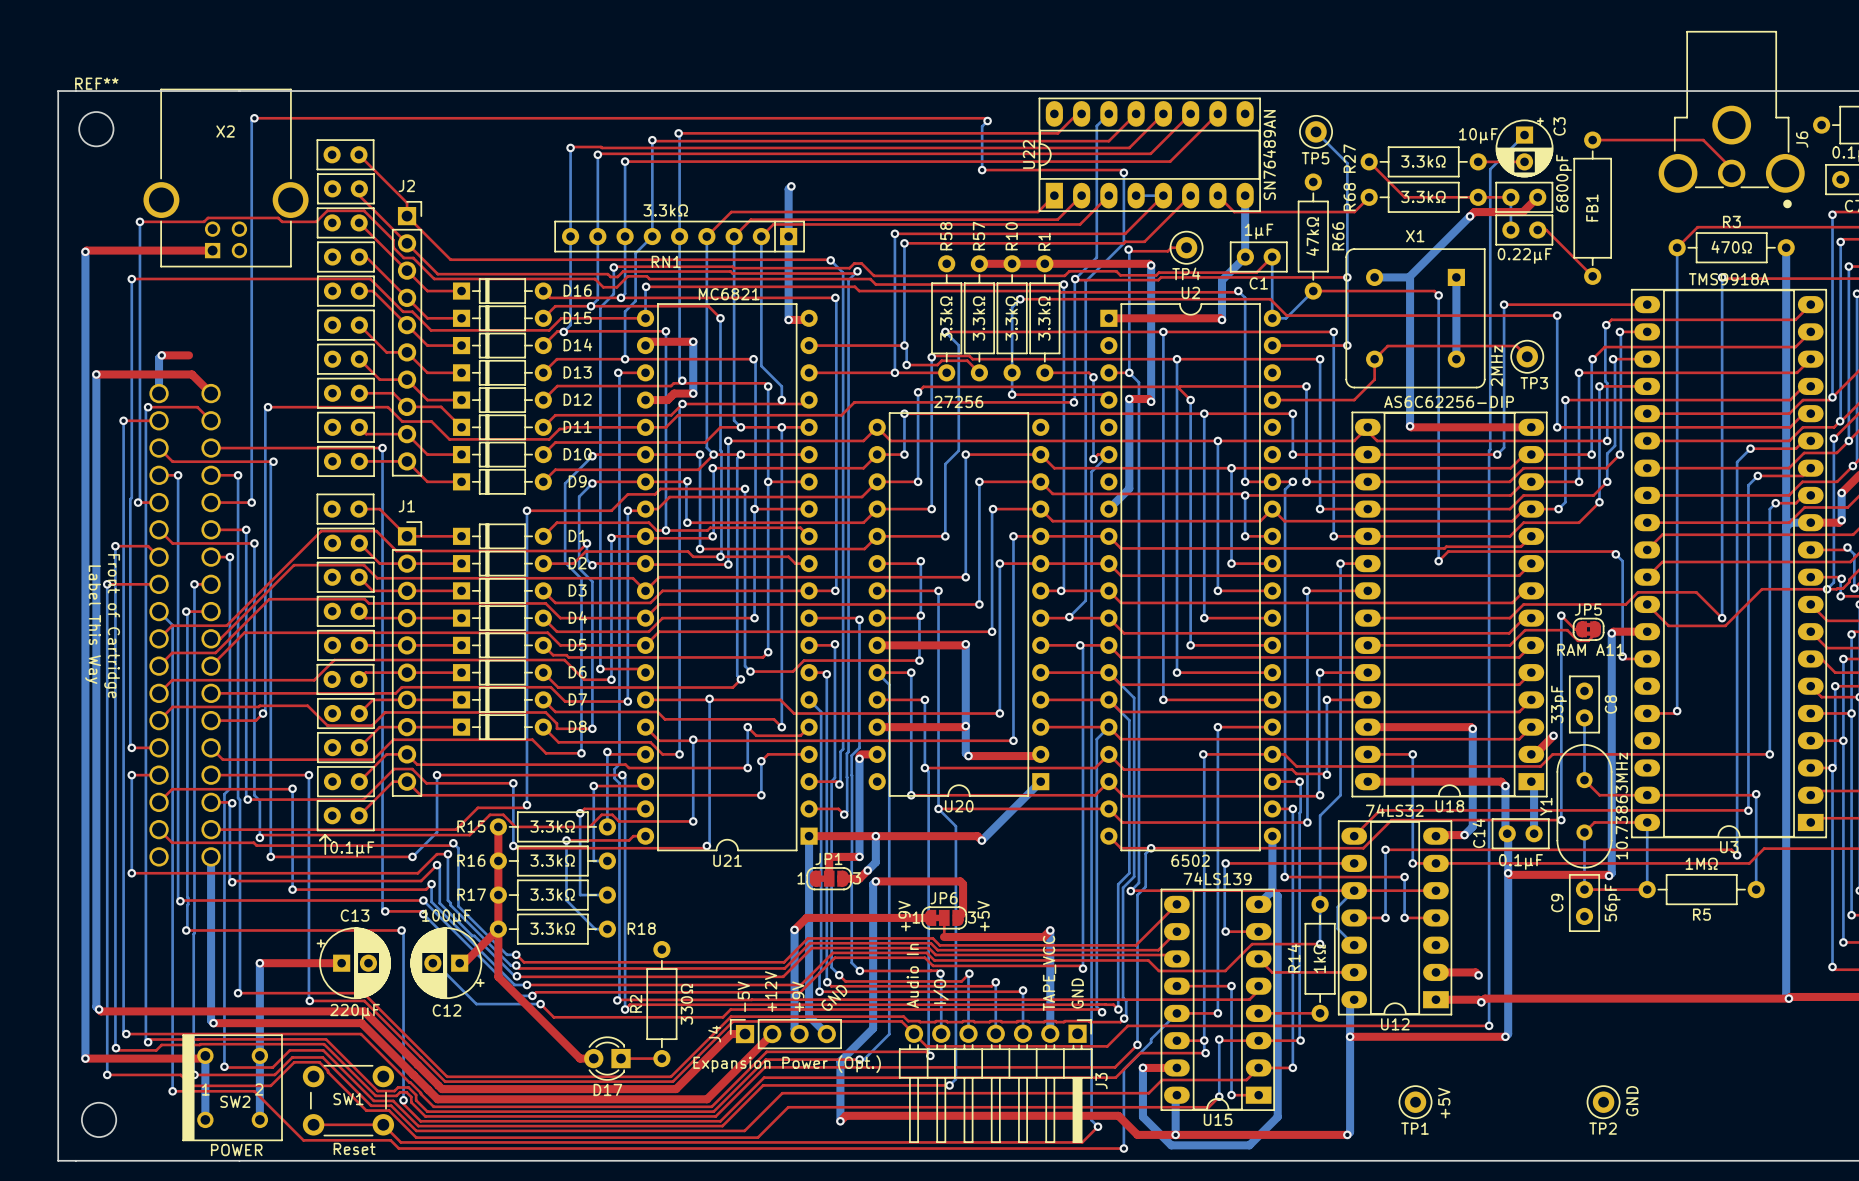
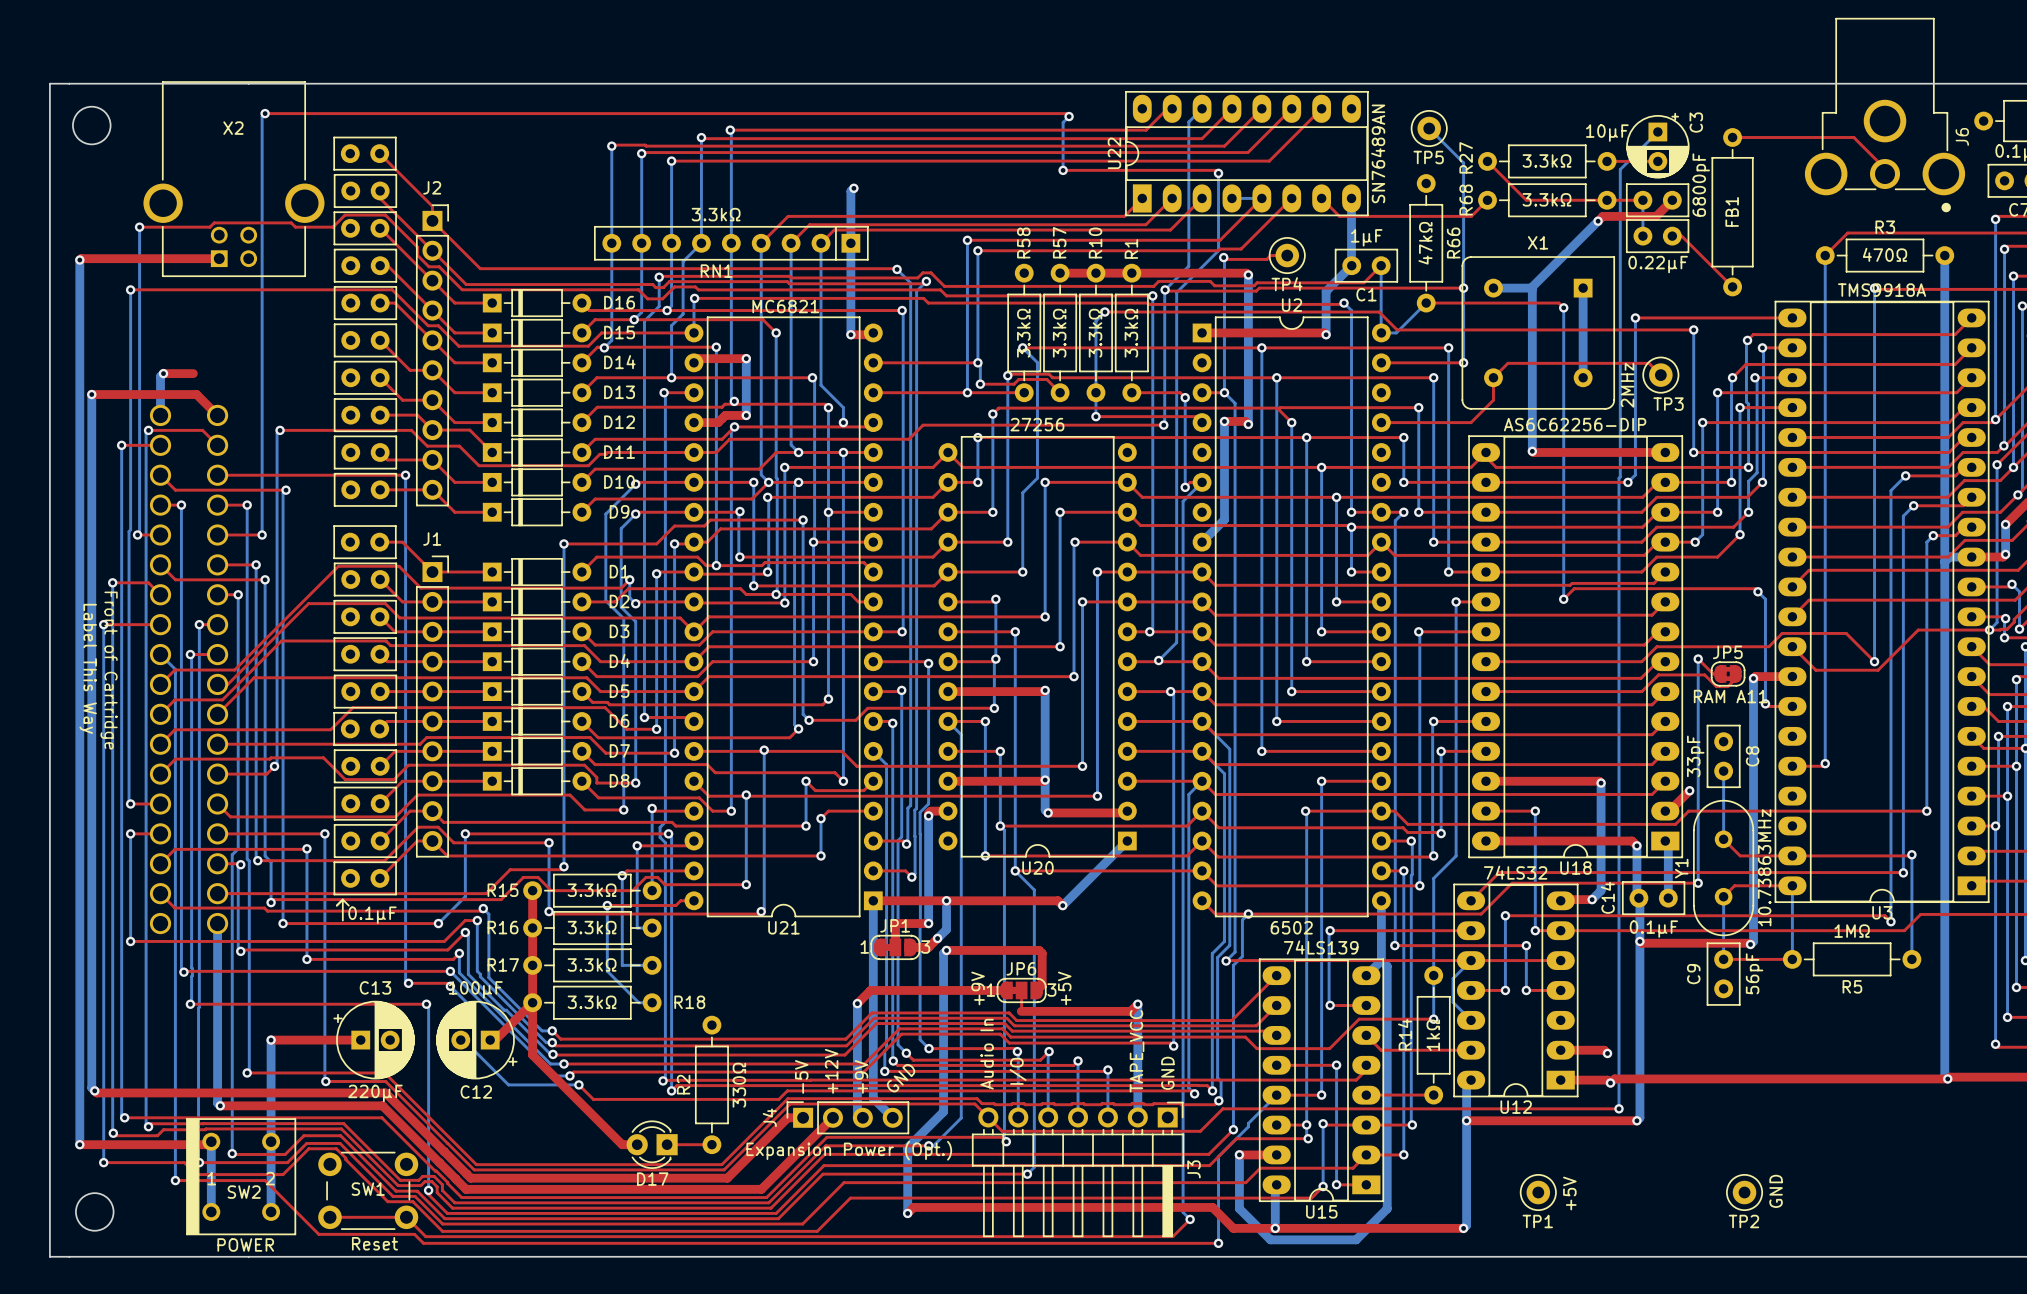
REF** name: REF** (96, 83) -> none

